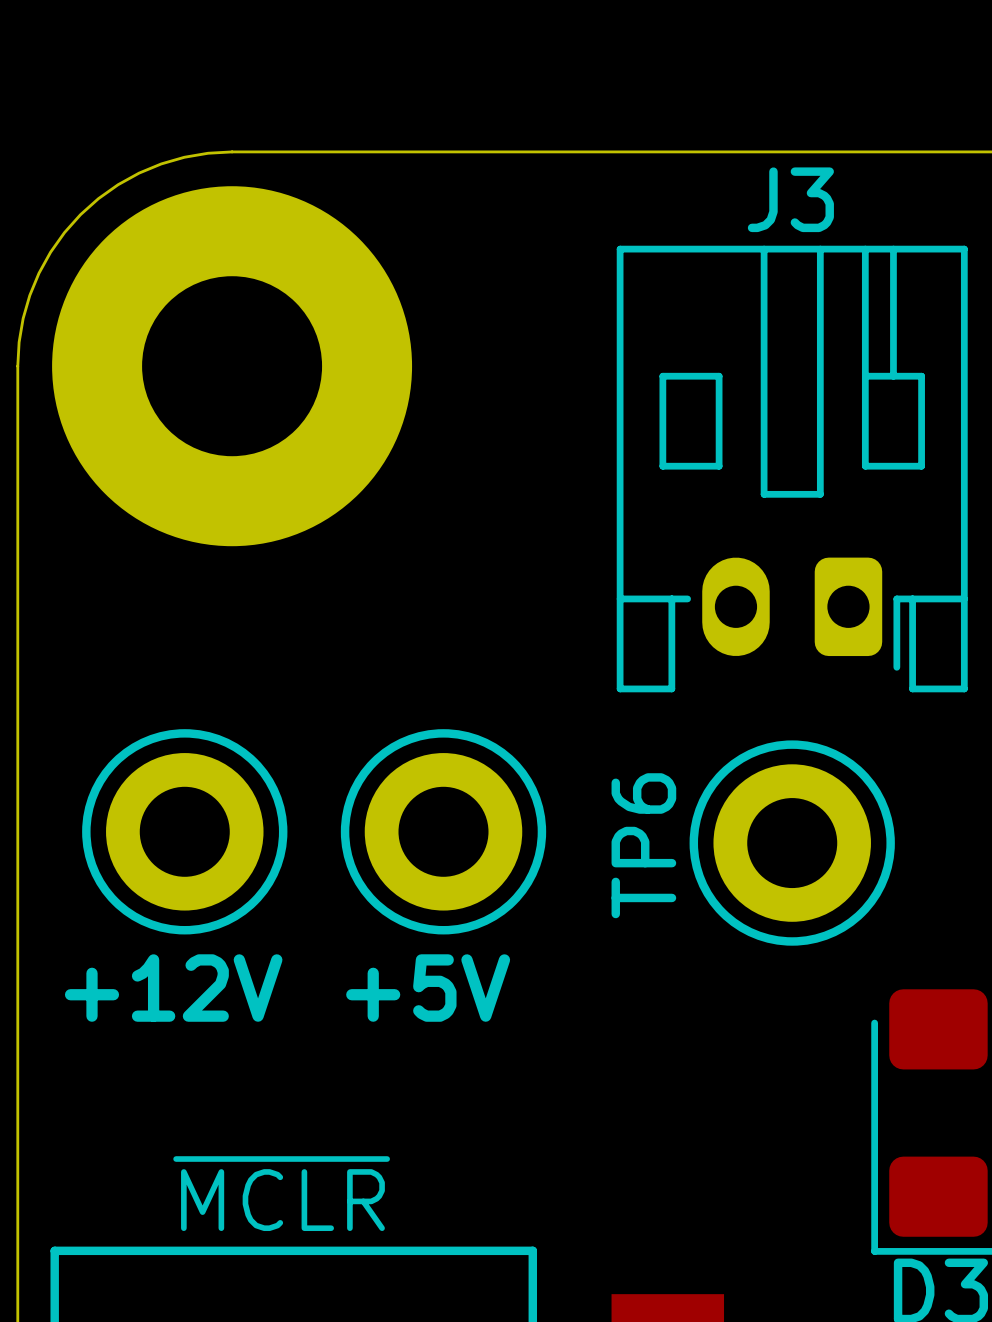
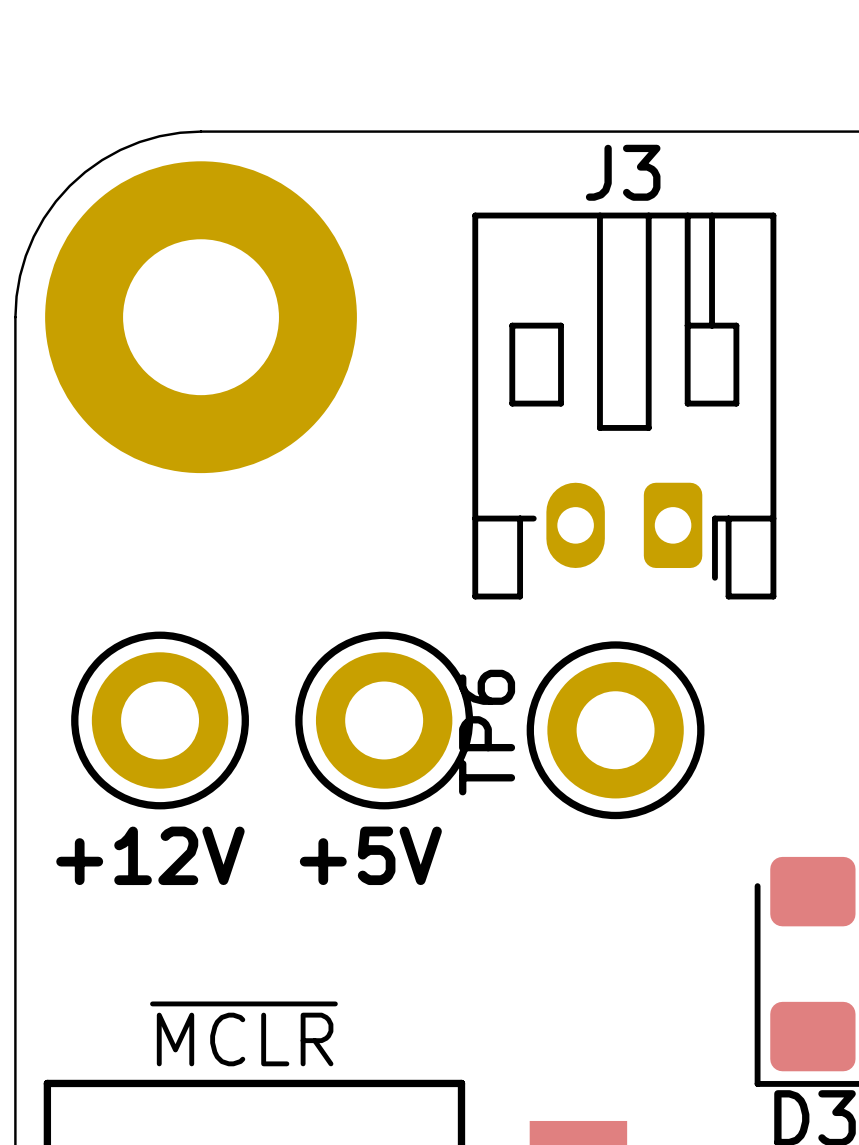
J3 position: (792, 469) -> (624, 406)
TP6 position: (792, 843) -> (615, 730)

